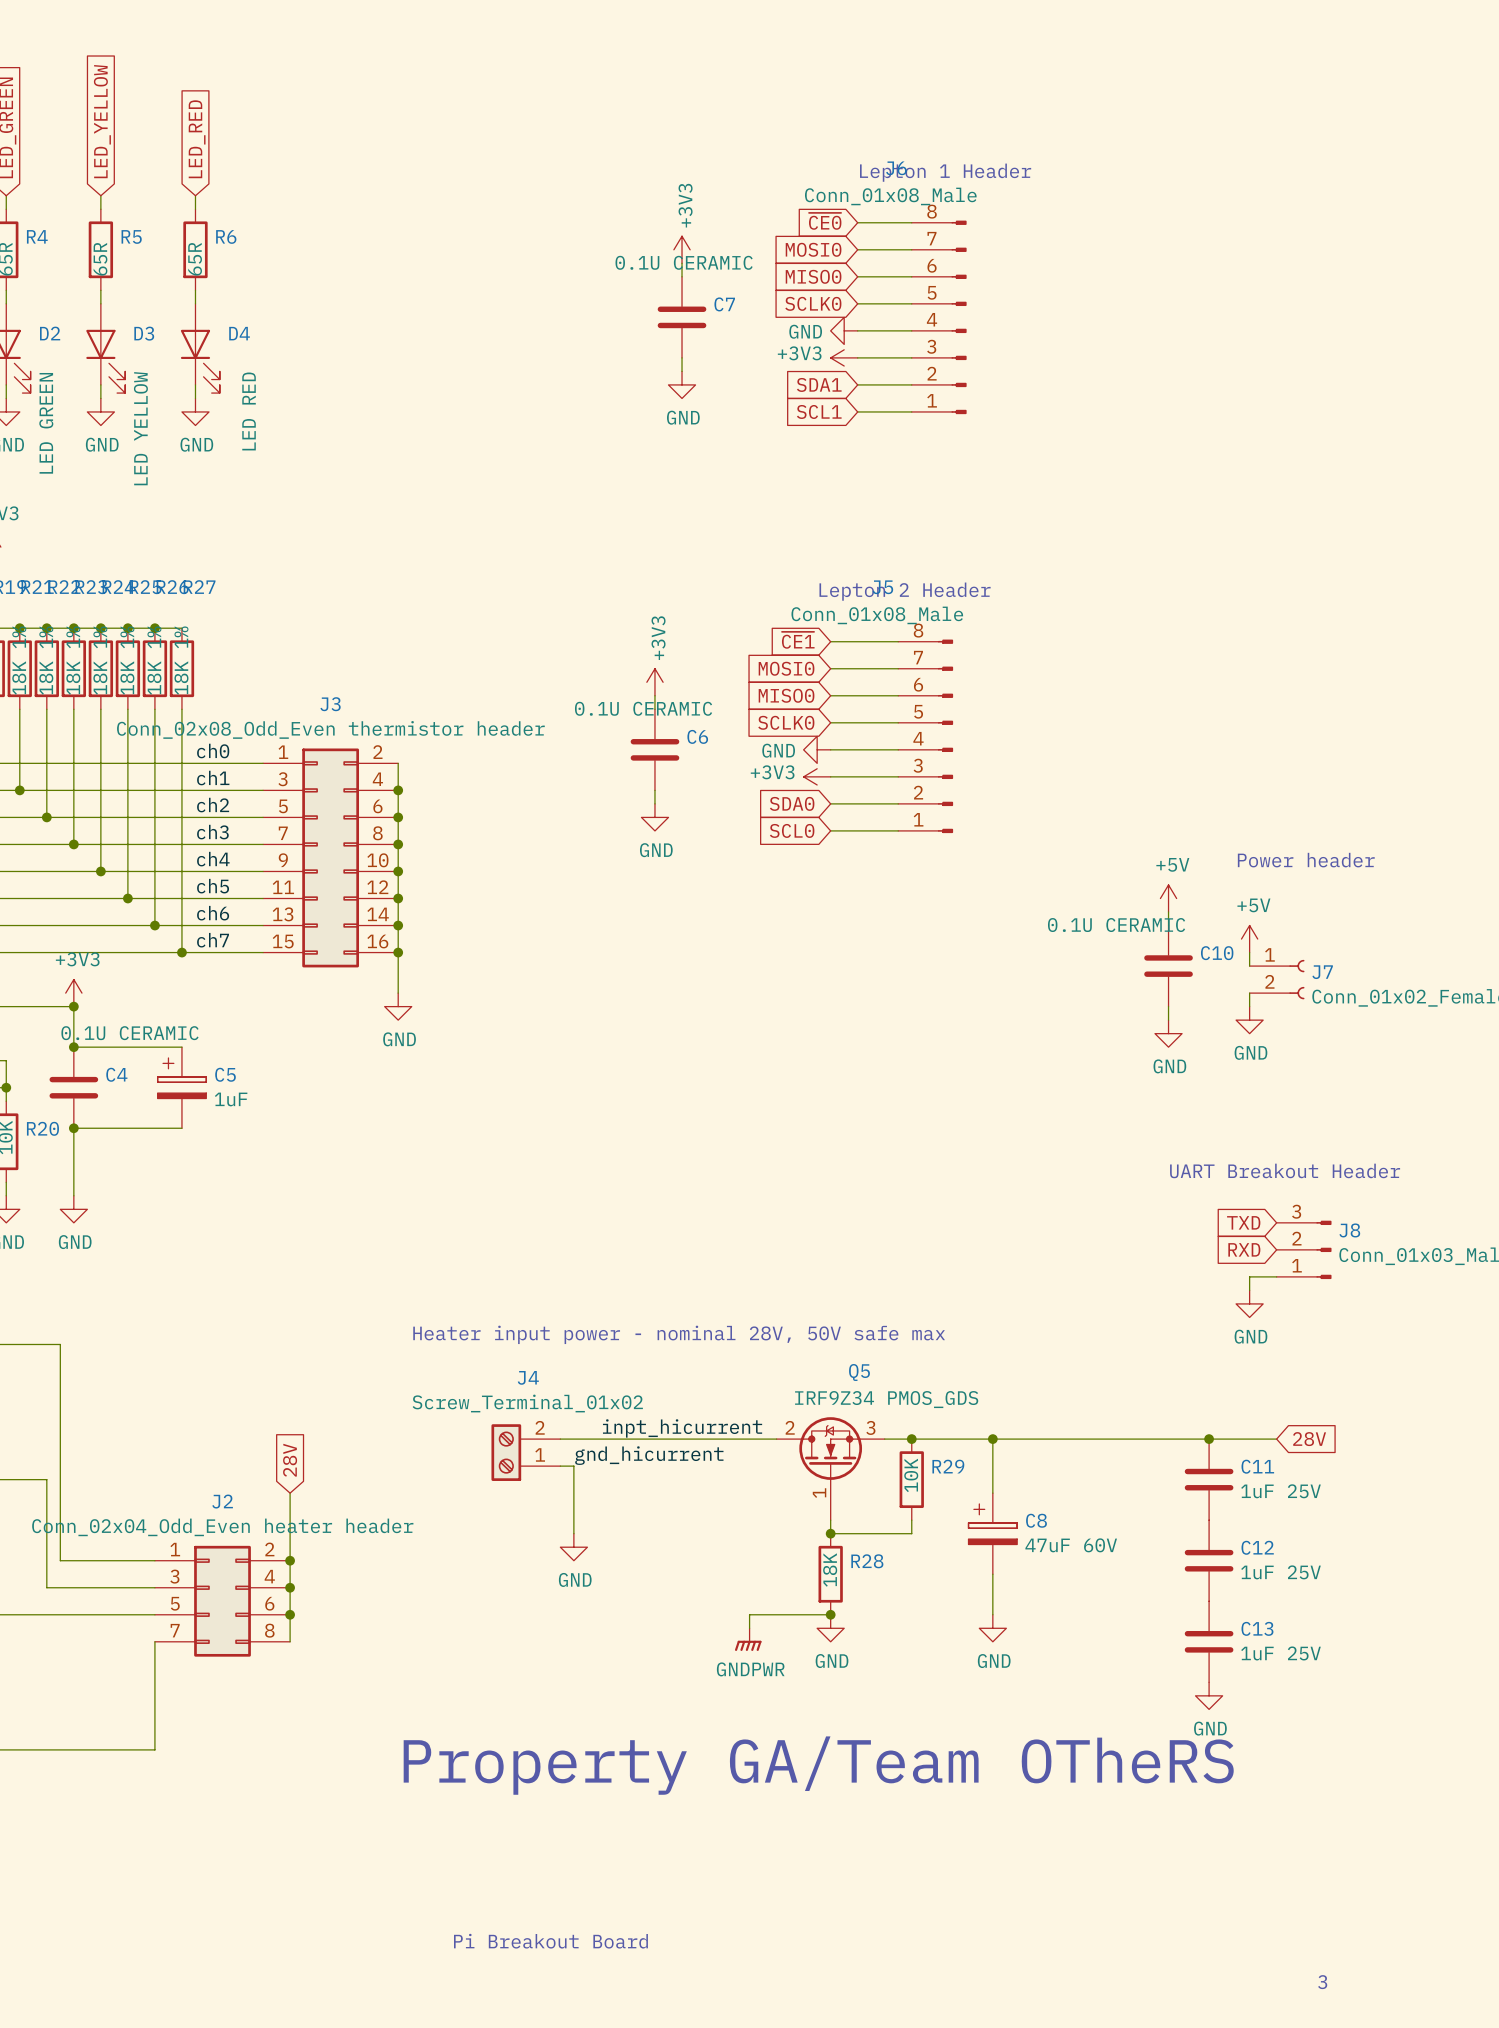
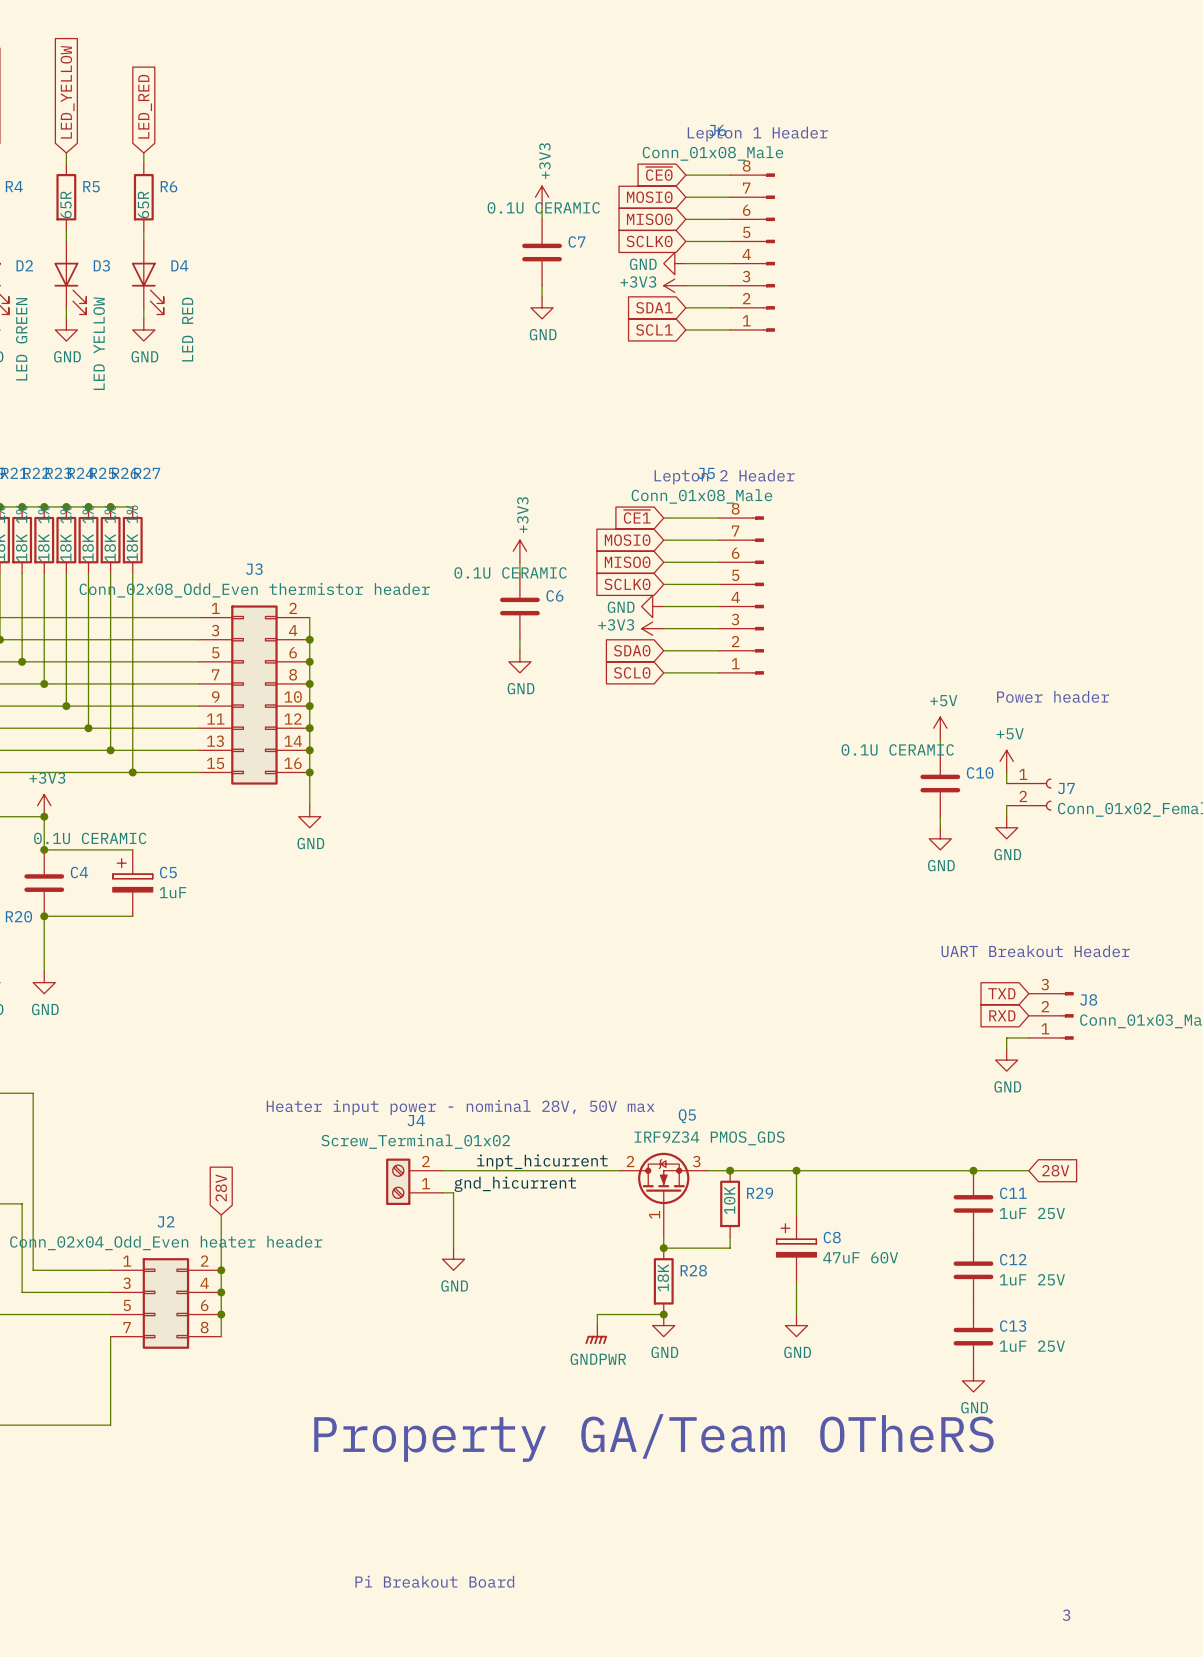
label: ch0 (213, 751) -> none
label: ch1 (213, 778) -> none
label: ch2 (213, 805) -> none
label: ch3 (212, 832) -> none
label: ch4 (213, 859) -> none
label: ch5 (213, 886) -> none
label: ch6 (213, 913) -> none
label: ch7 (213, 940) -> none
text: Heater input power - nominal 28V, 50V safe max (679, 1334) -> Heater input power - nominal 28V, 50V max (460, 1107)

